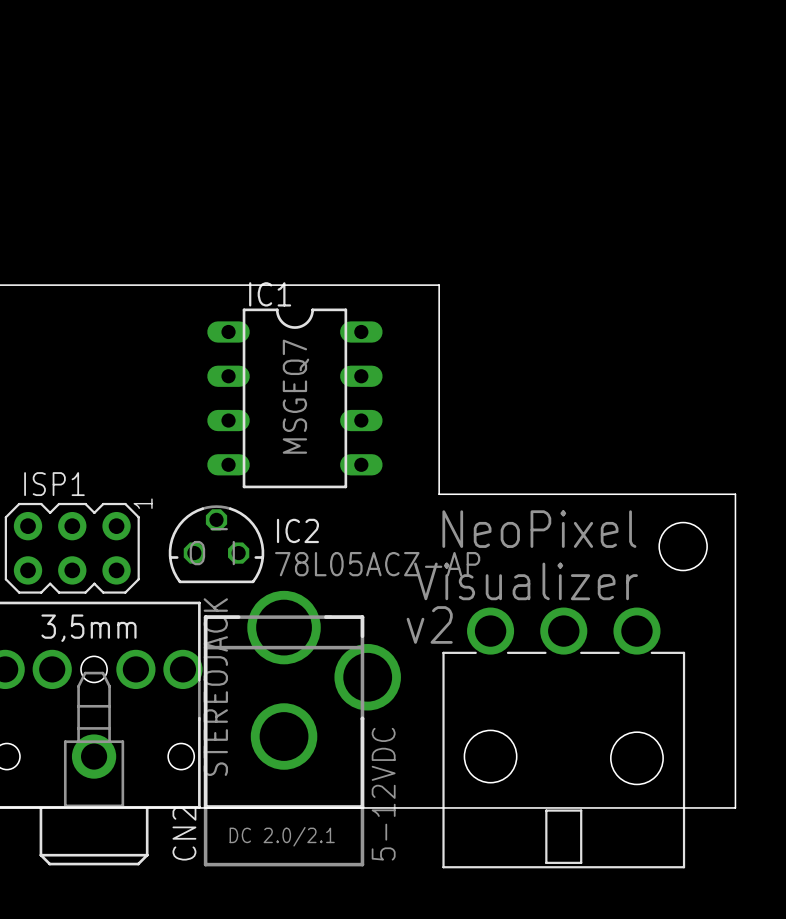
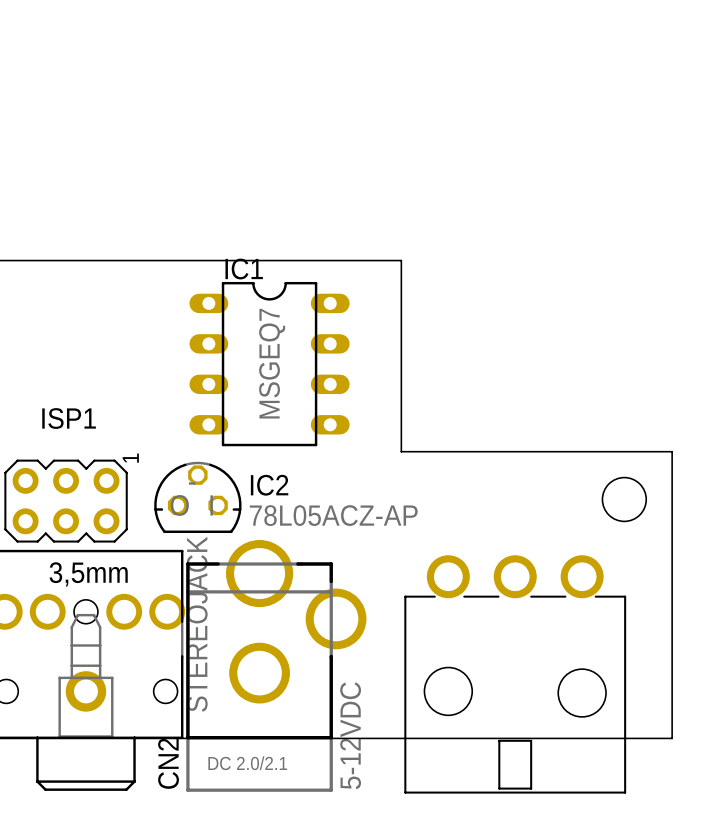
ISP1 name position: ISP1 (54, 484) -> ISP1 (69, 418)
text: NeoPixel (539, 529) -> none
text: Visualizer (525, 581) -> none
text: v2 (429, 624) -> none

